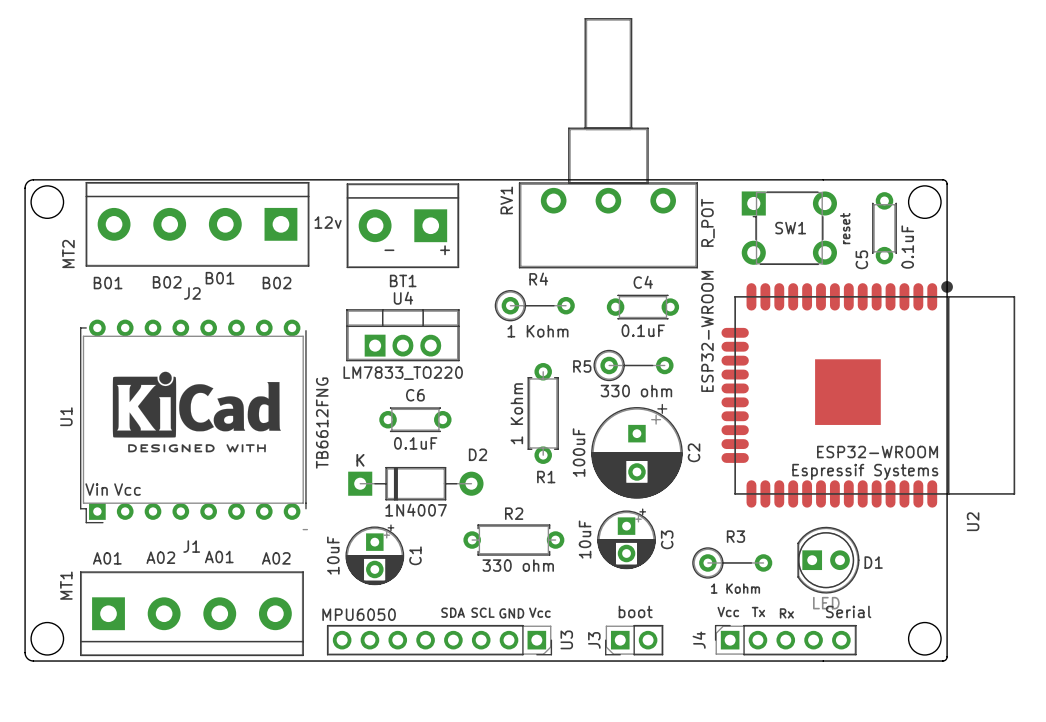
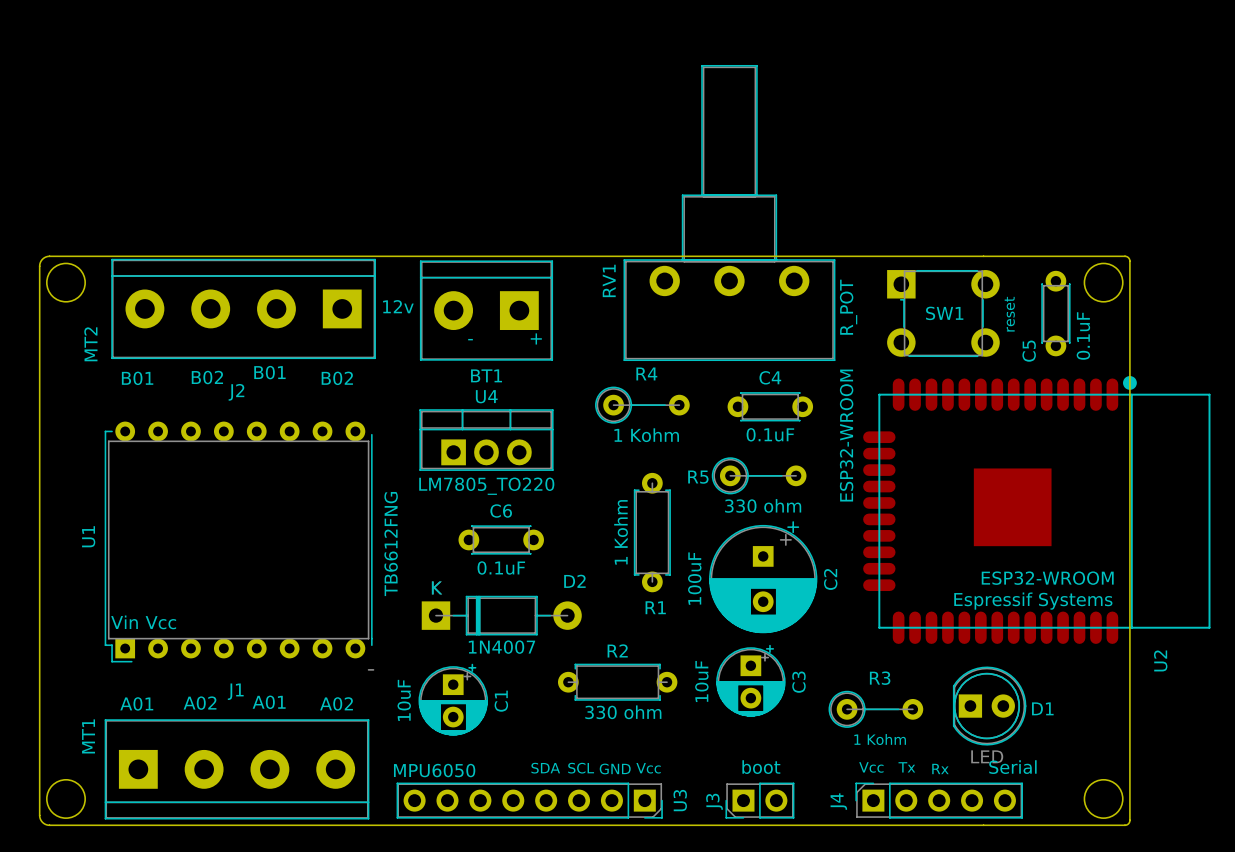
drawing: [112, 371, 281, 453] -> none
U4 value: LM7833_TO220 (403, 373) -> LM7805_TO220 (486, 486)

